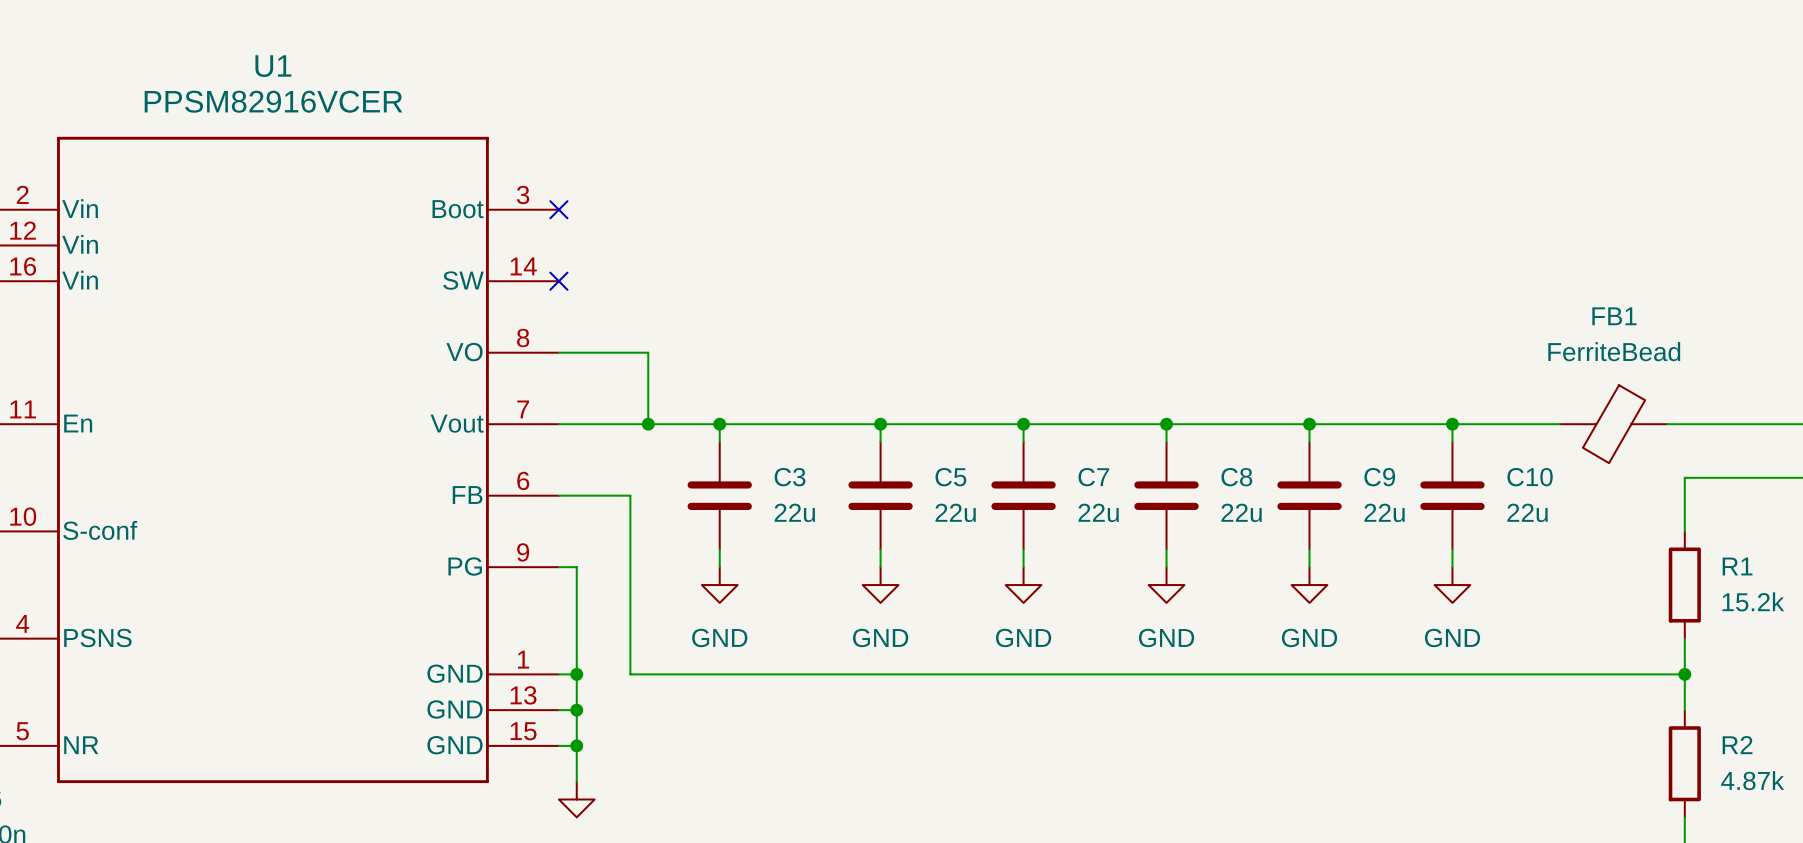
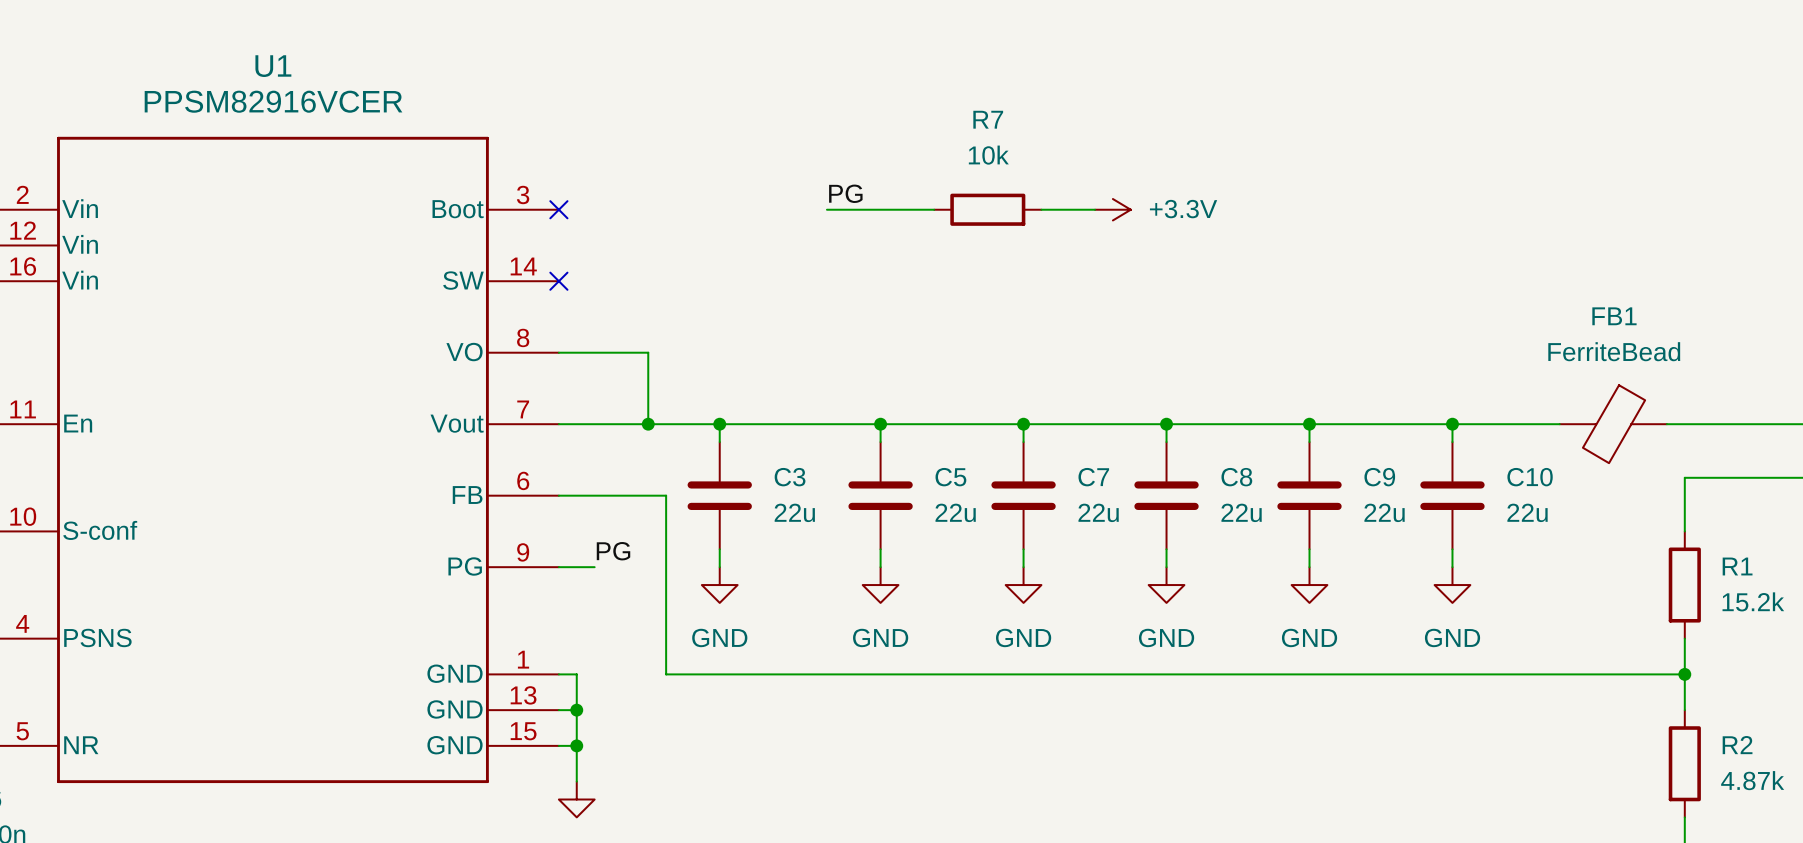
label: none -> PG (845, 193)
wire: none -> (826, 209) (934, 209)
R7: none -> 10k (987, 209)
wire: none -> (1041, 209) (1095, 209)
power symbol: none -> +3.3V (1112, 209)
wire: (630, 495) (630, 674) (666, 674) -> (630, 495) (666, 495) (666, 674)
label: none -> PG (613, 551)
wire: (576, 567) (576, 674) -> (576, 567) (594, 567)
junction: (576, 674) -> none

